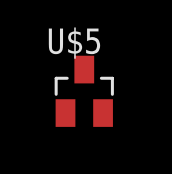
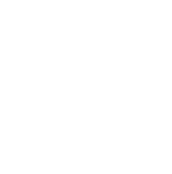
U$5: (84, 91) -> none

